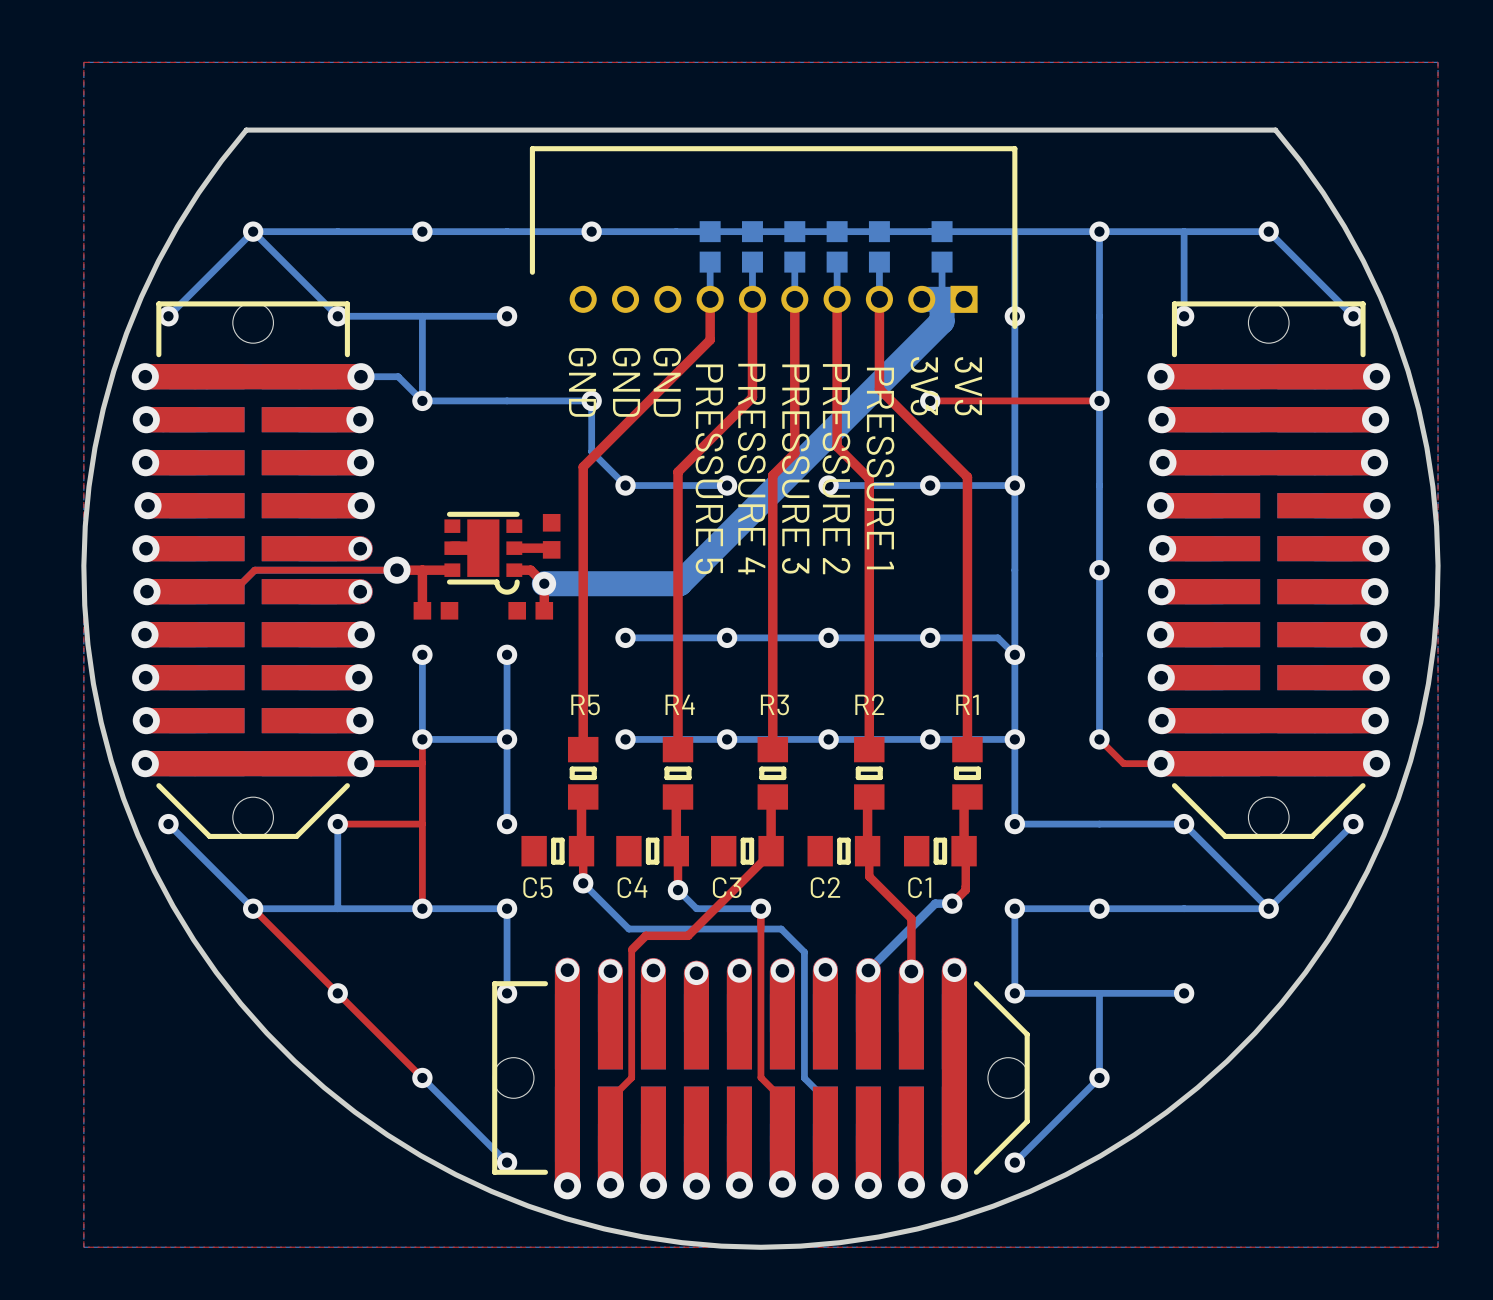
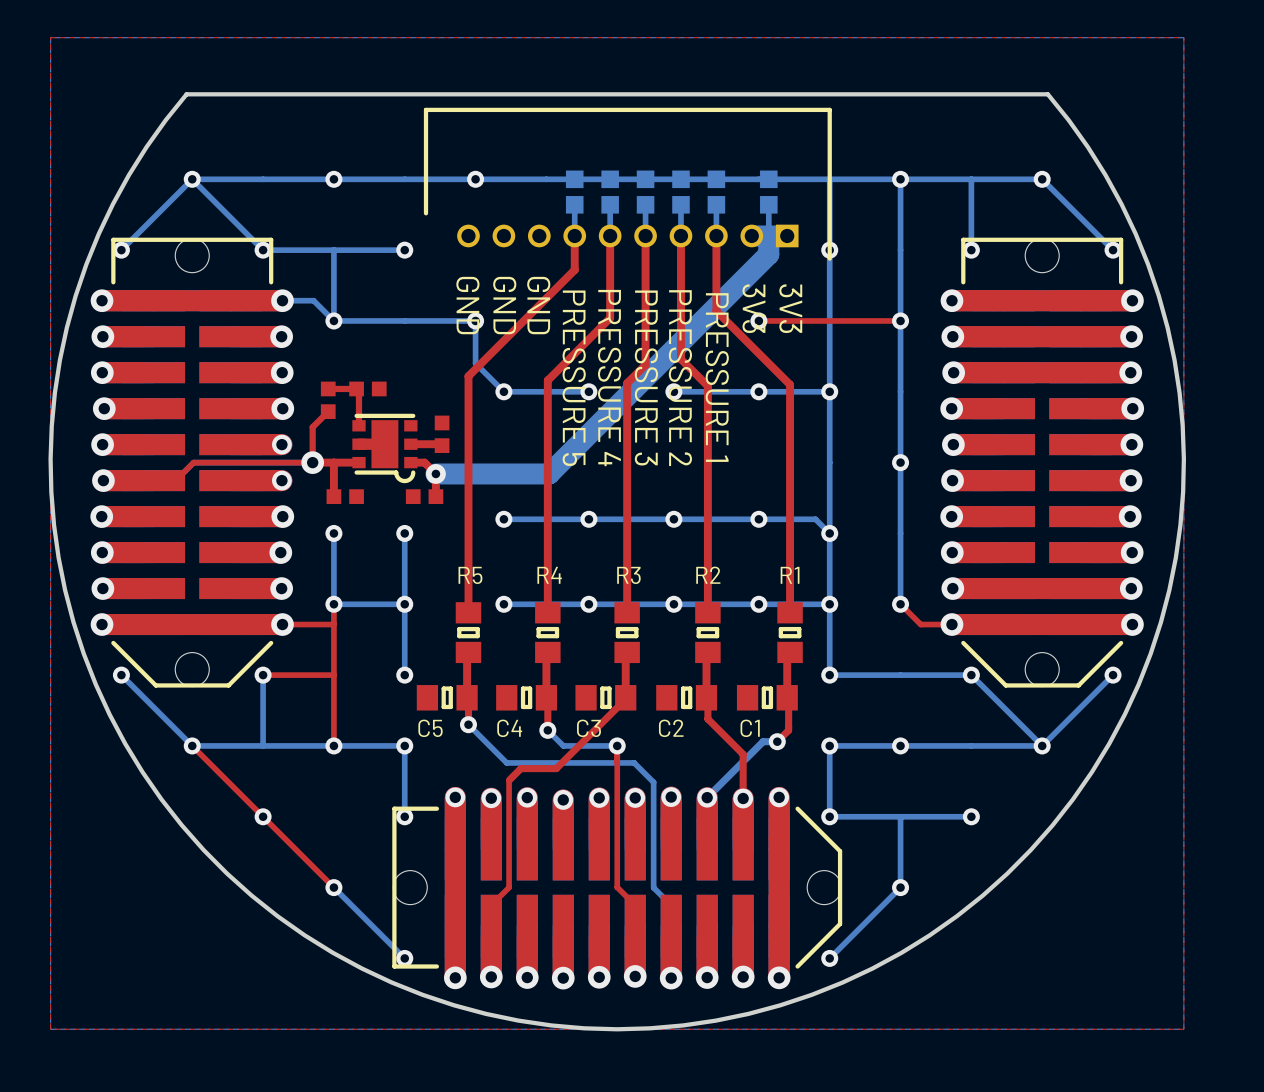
top track: none -> (328, 388) (356, 388) (358, 391) (358, 425)
part: none -> (367, 388)
part: none -> (328, 400)
top track: none -> (328, 411) (312, 427) (312, 462)

